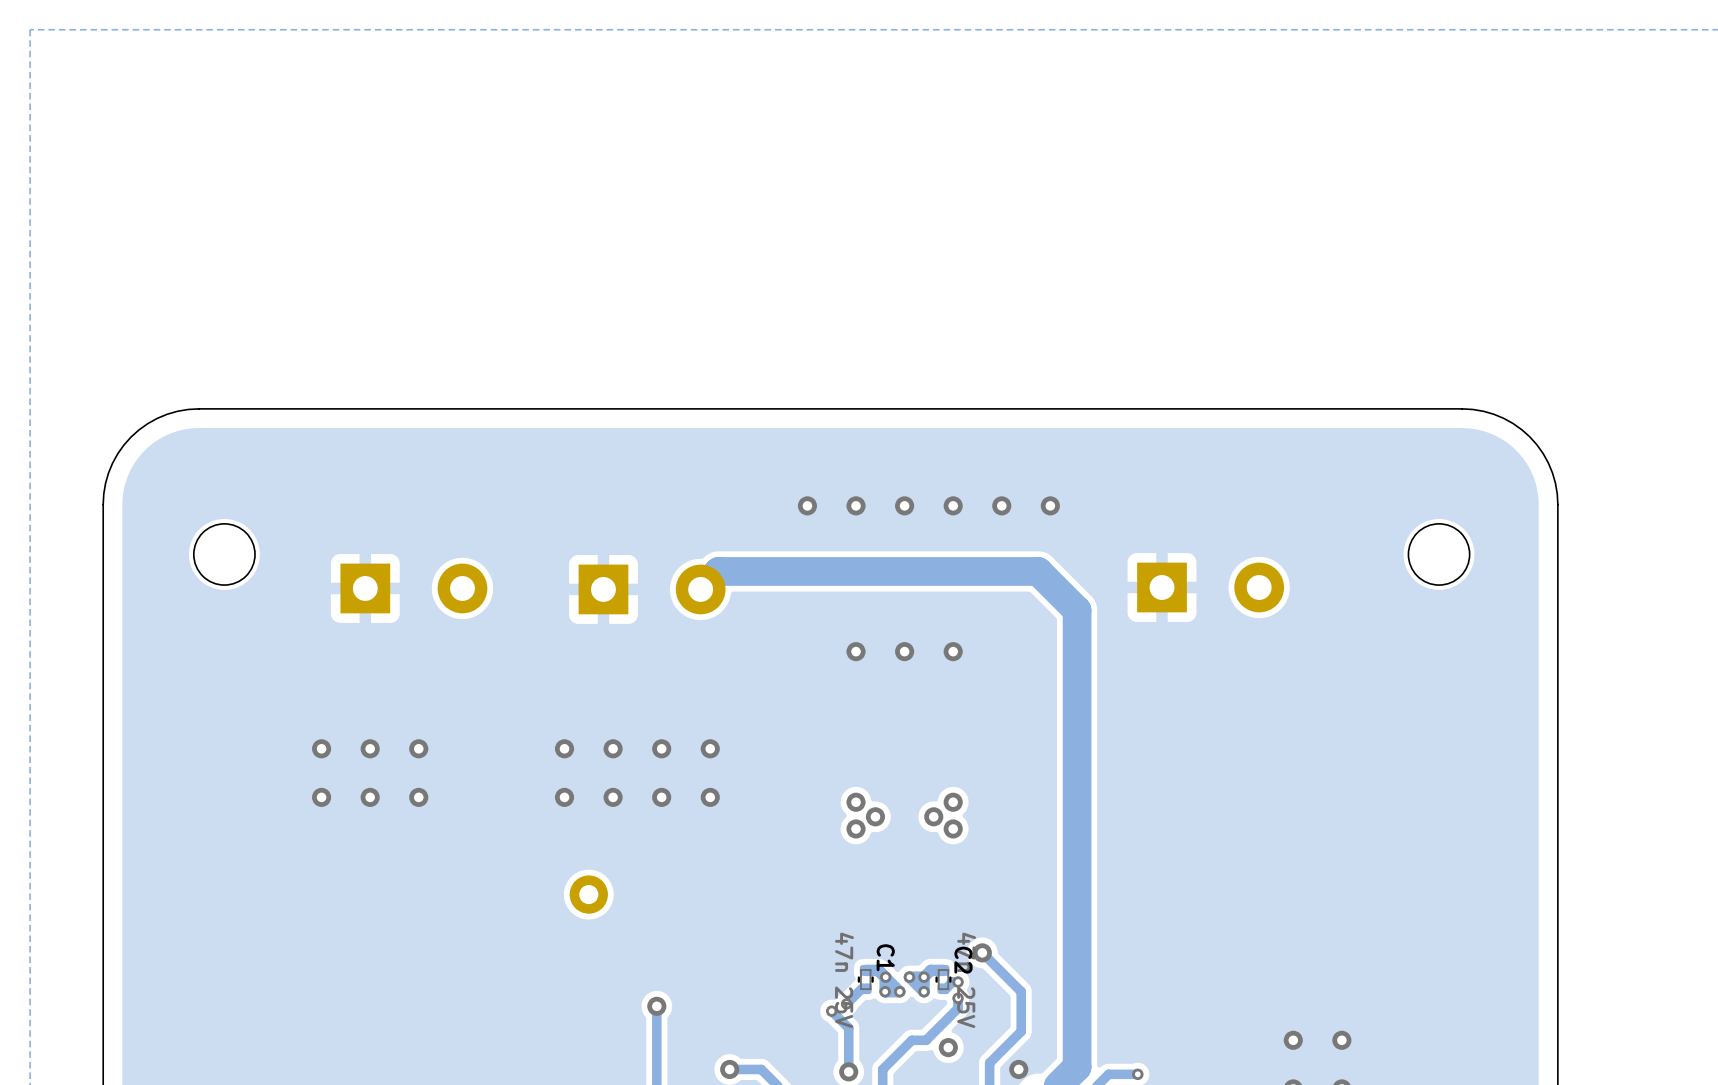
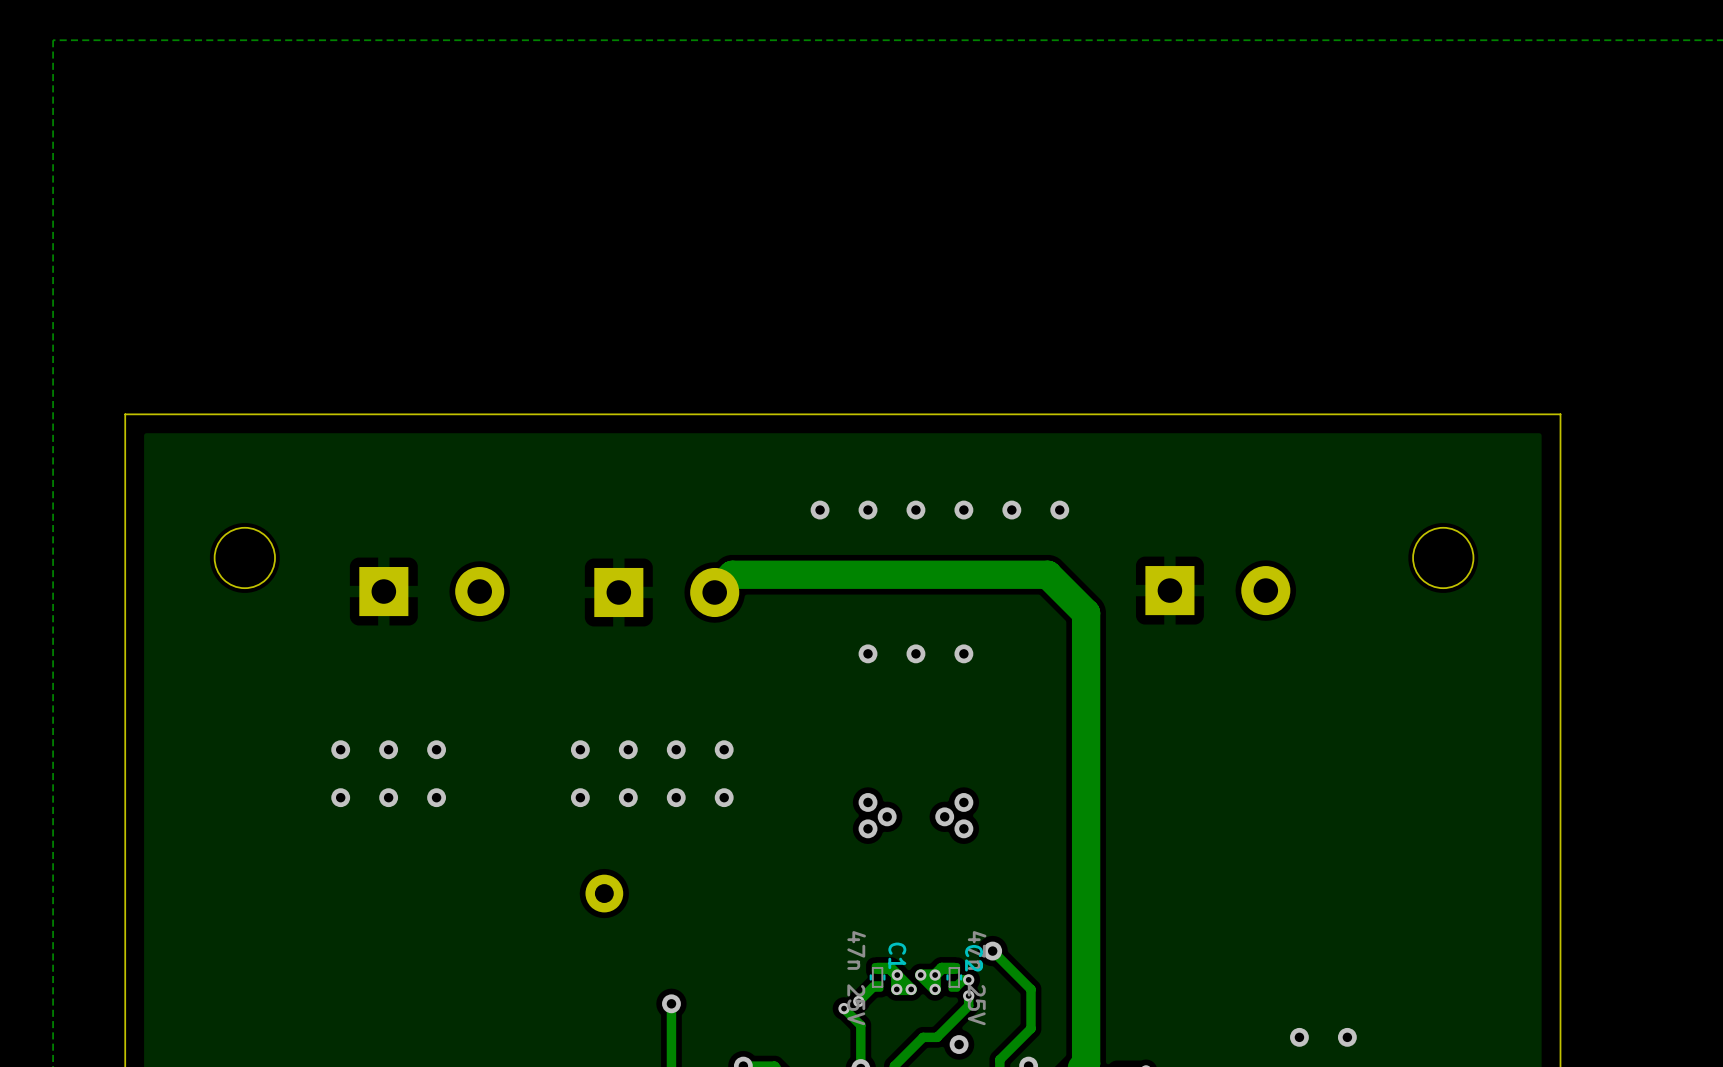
board edge: (198, 408) (167, 414) (147, 423) (131, 436) (112, 463) (105, 483) (103, 504) -> (219, 414) (125, 414) (125, 508)
board edge: (1462, 408) (1493, 414) (1513, 423) (1529, 436) (1543, 453) (1552, 472) (1557, 504) -> (1466, 414) (1560, 414) (1560, 508)

